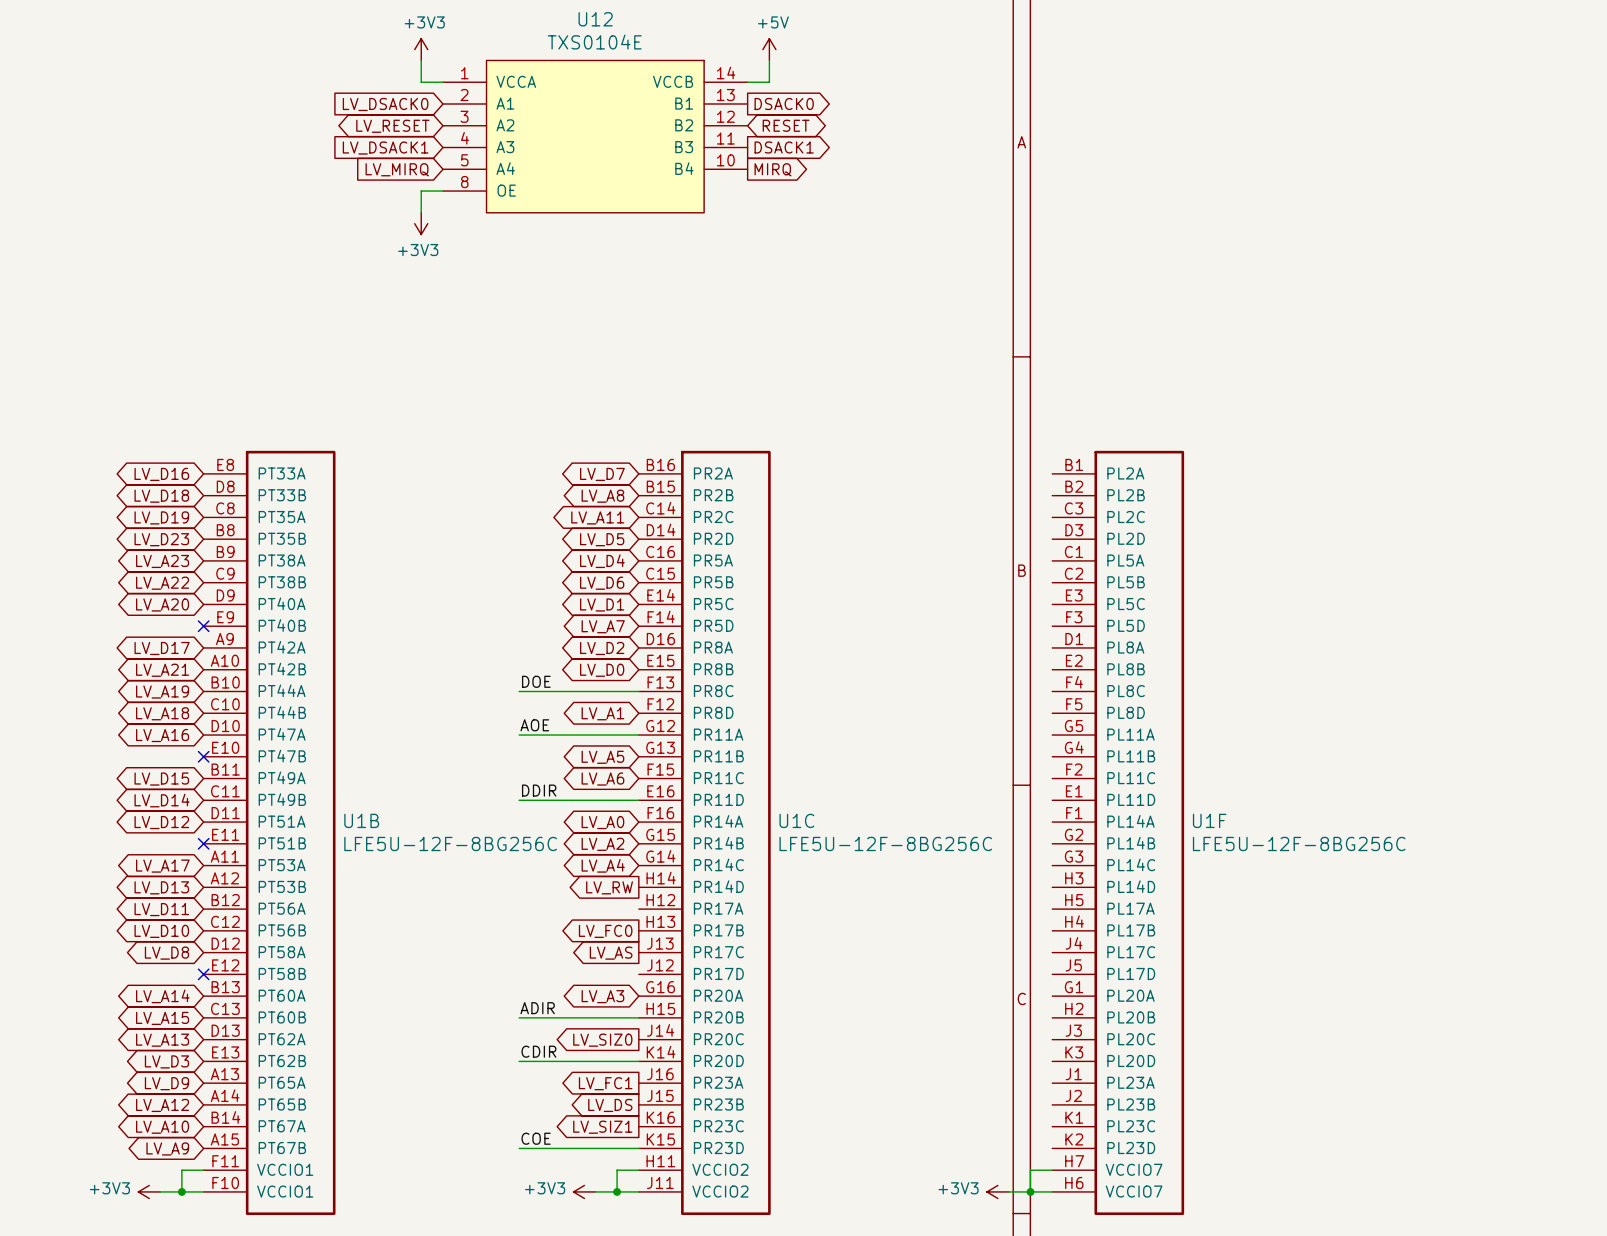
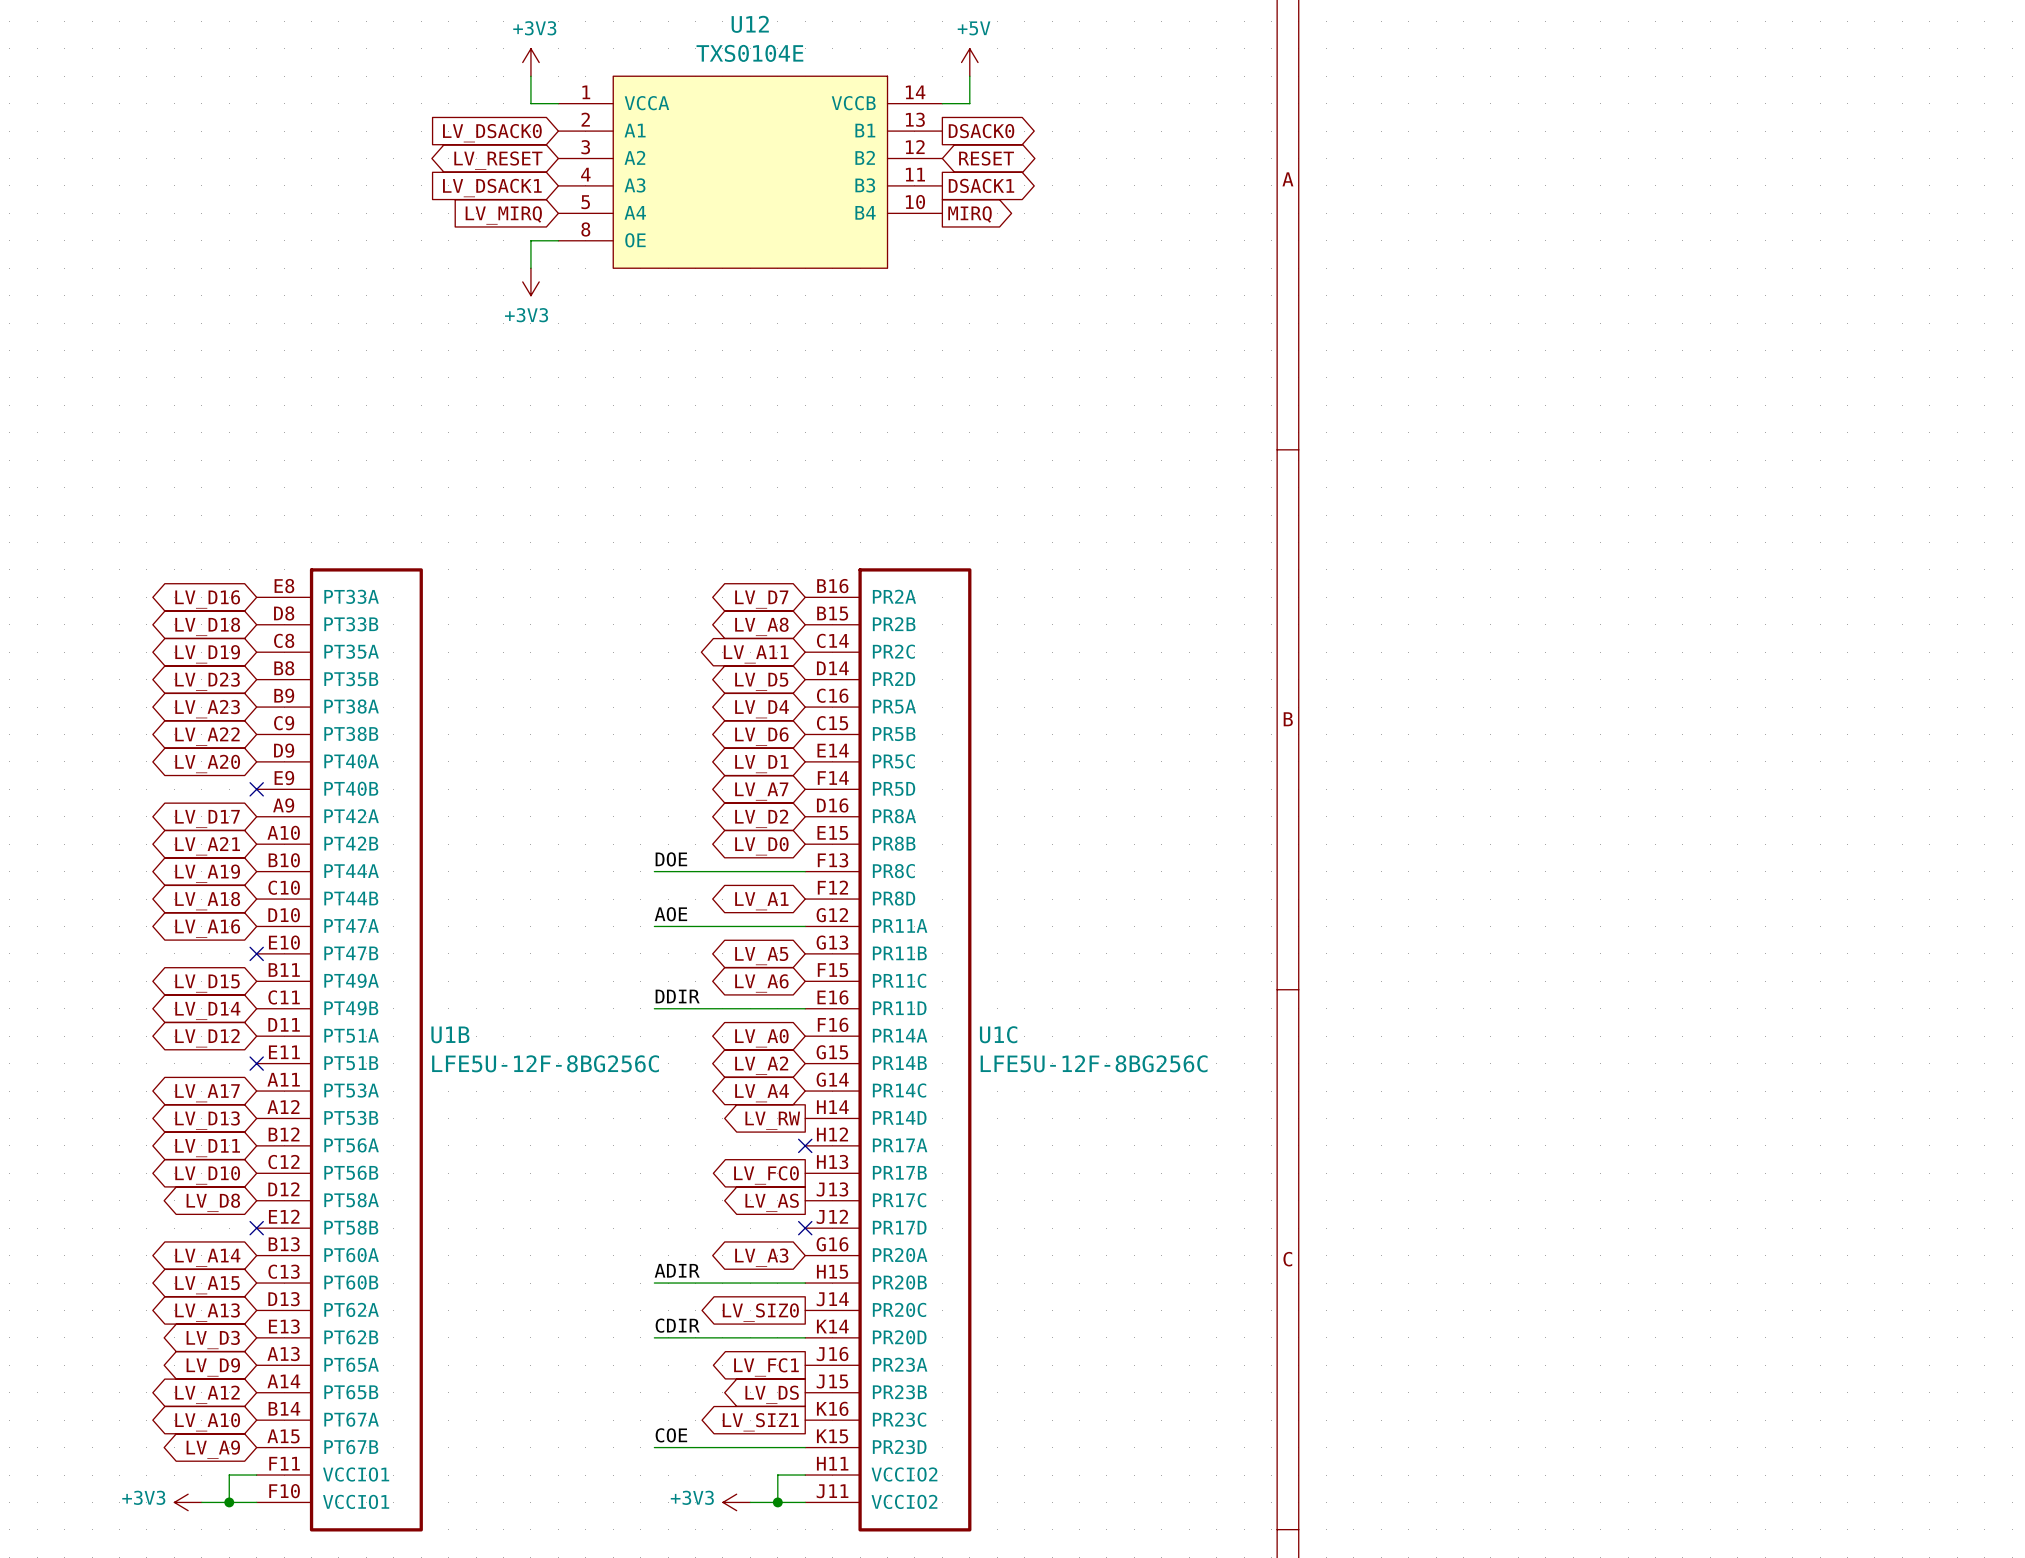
U1F: LFE5U-12F-8BG256C (1118, 832) -> none
no-connect mark: none -> (805, 1145)
no-connect mark: none -> (805, 1228)
wire: (1052, 1170) (1030, 1170) (1030, 1191) -> none
power symbol: +3V3 (997, 1191) -> none
wire: (1008, 1191) (1052, 1191) -> none
junction: (1030, 1191) -> none

